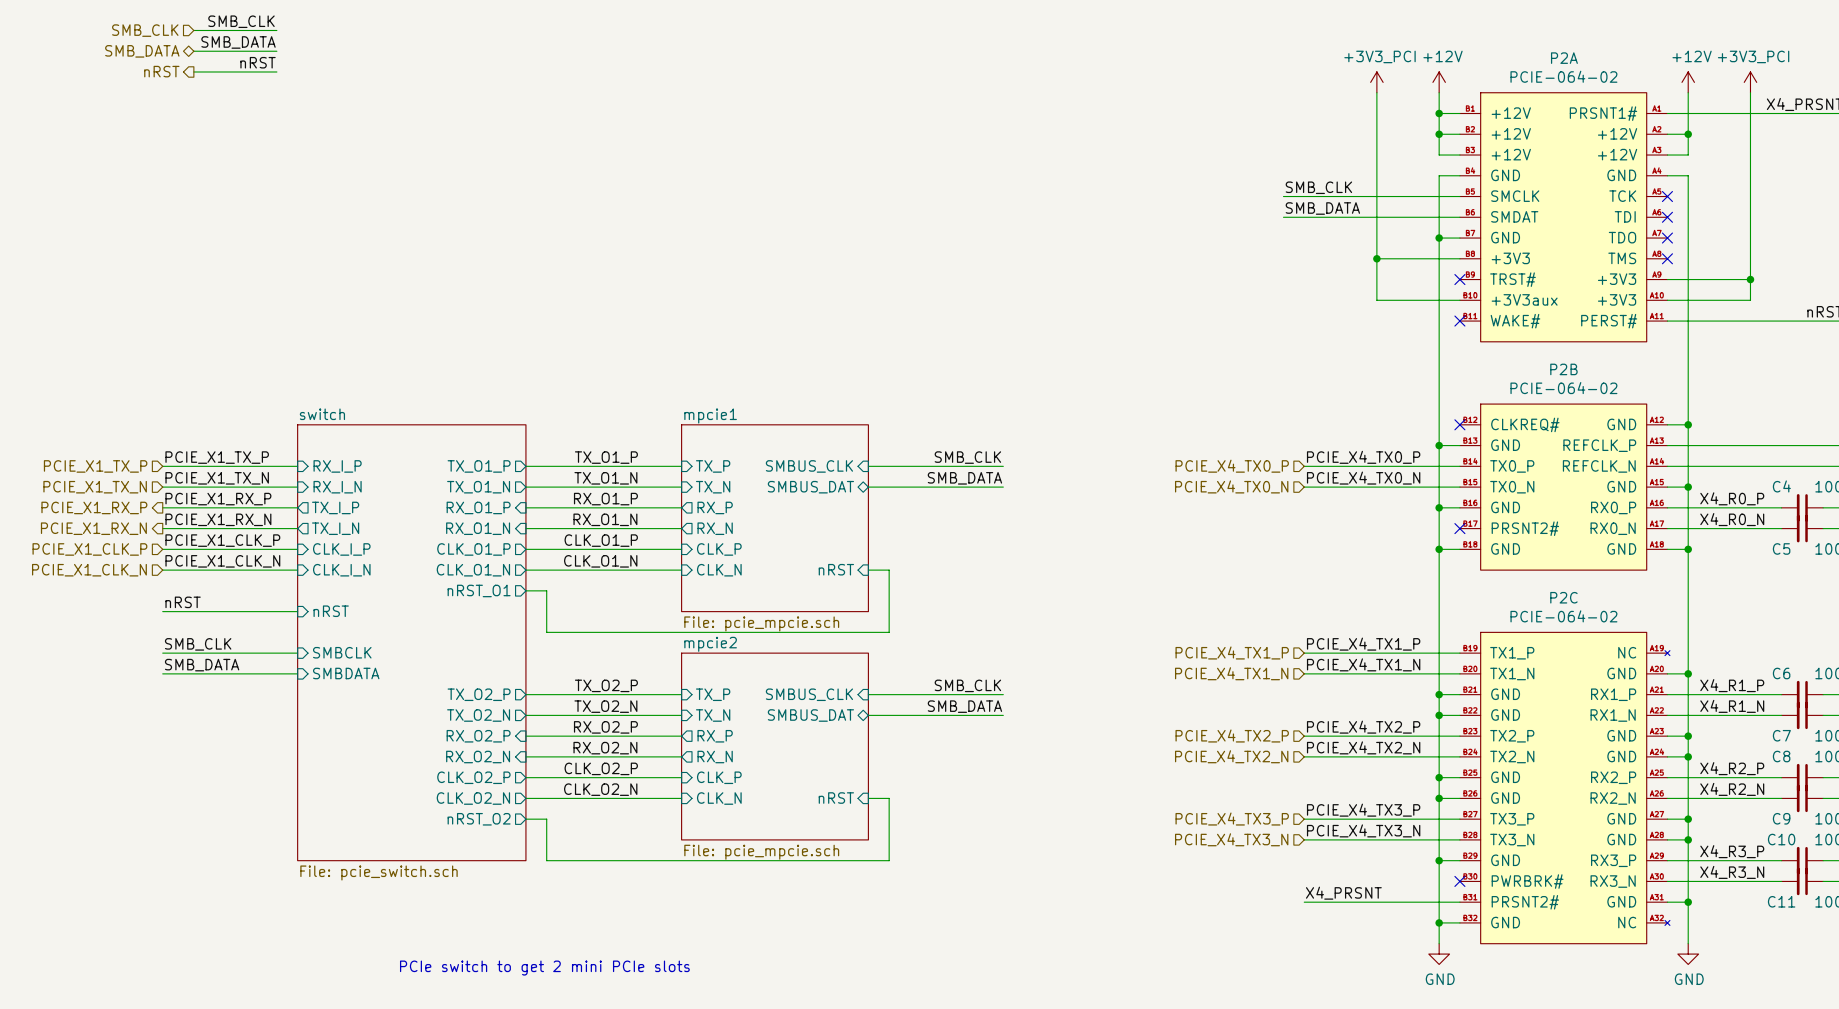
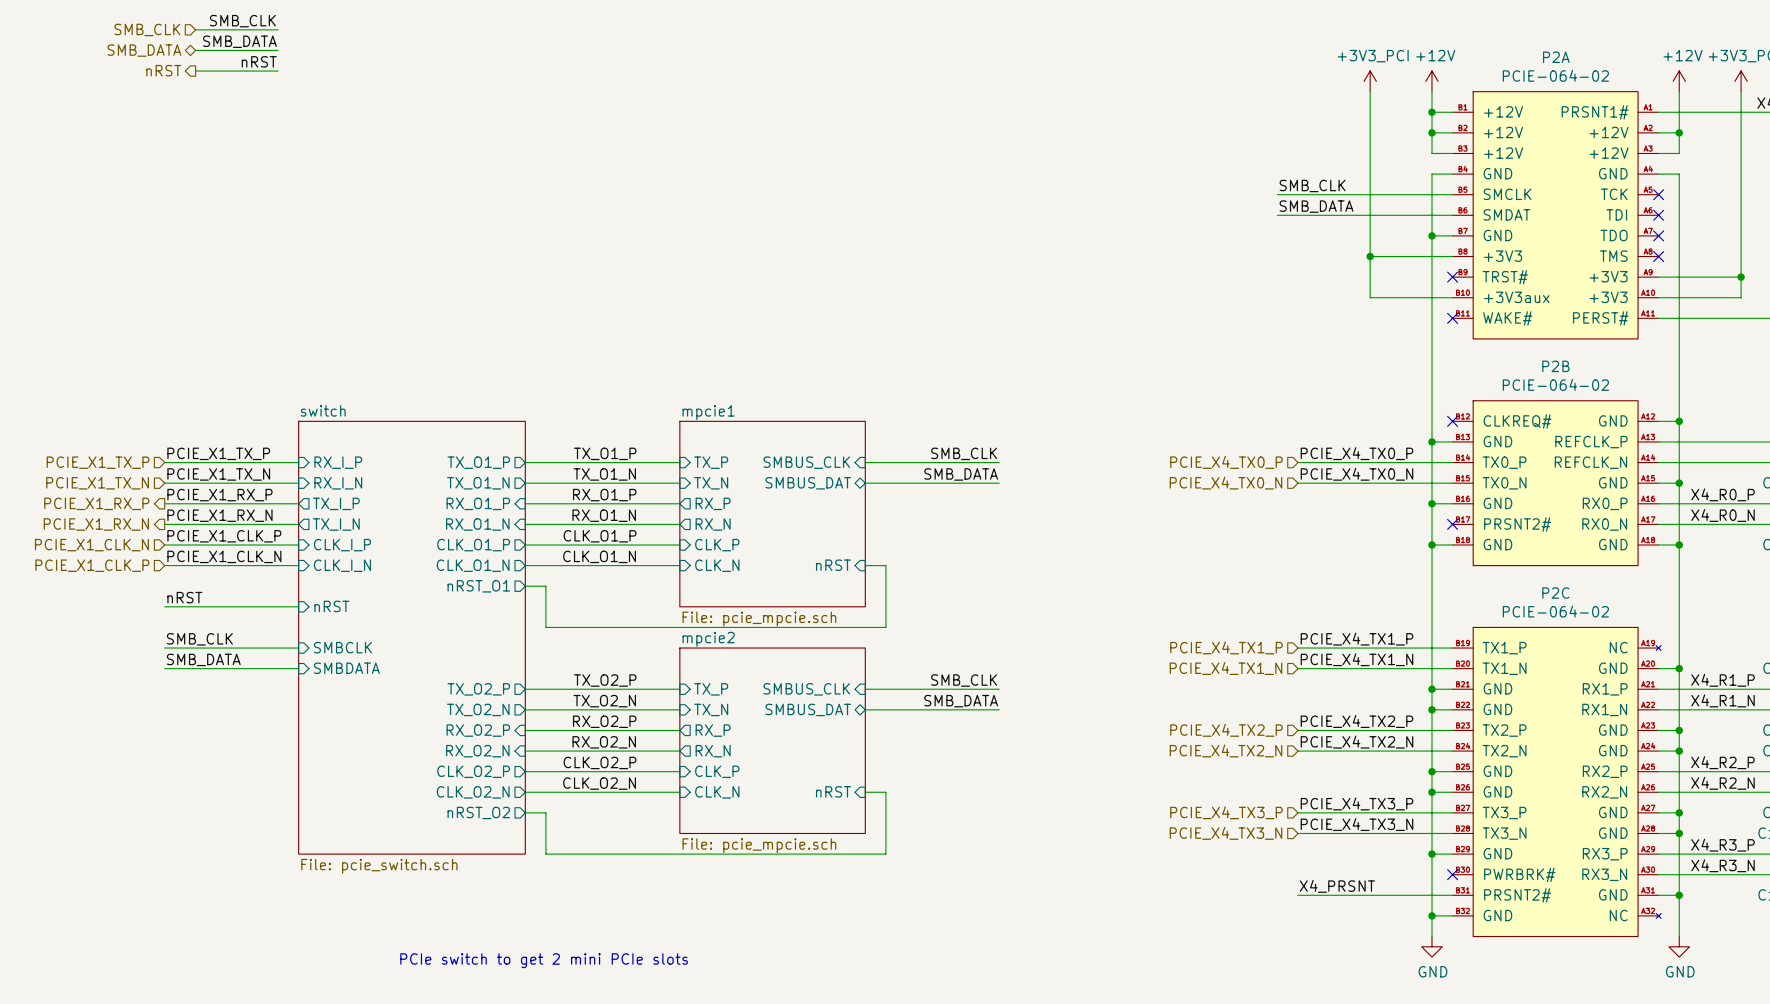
hierarchical label: PCIE_X1_CLK_P (89, 549) -> PCIE_X1_CLK_N (91, 545)
hierarchical label: PCIE_X1_CLK_N (89, 570) -> PCIE_X1_CLK_P (92, 565)

